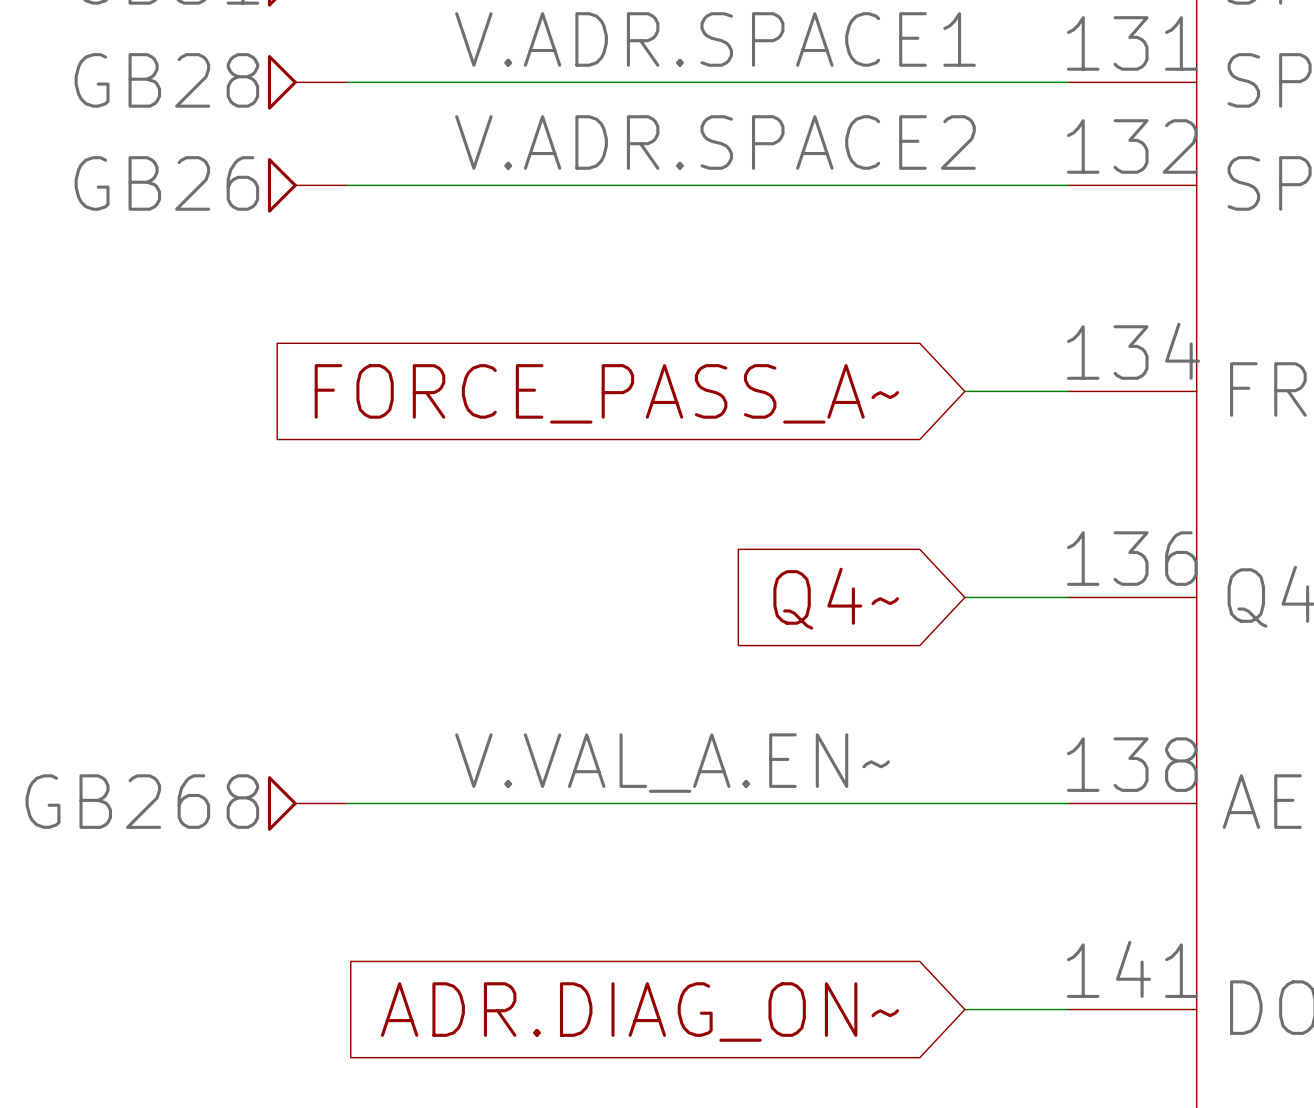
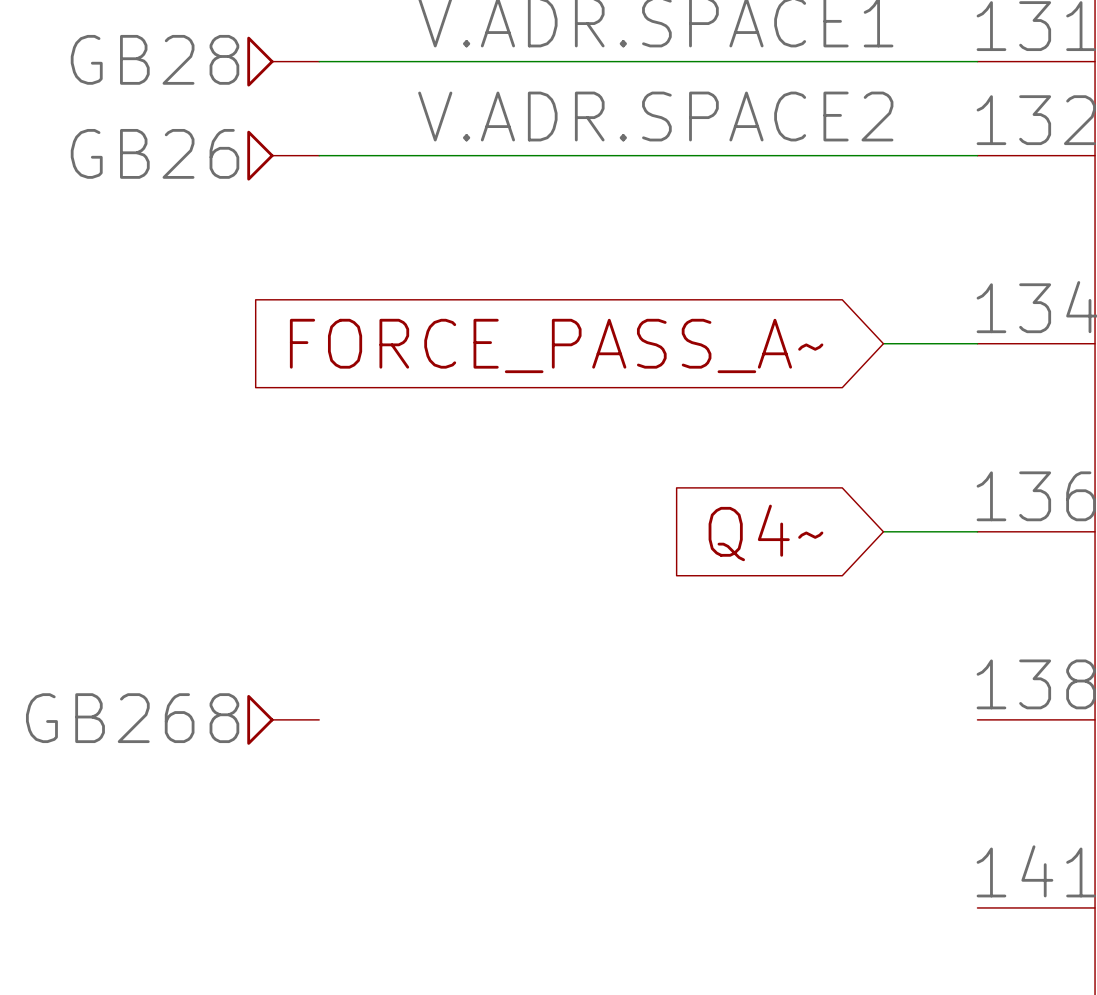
label: V.VAL_A.EN~ (672, 763) -> none
wire: (346, 803) (1067, 803) -> none
wire: (964, 1009) (1067, 1009) -> none
global label: ADR.DIAG_ON~ (639, 1012) -> none

